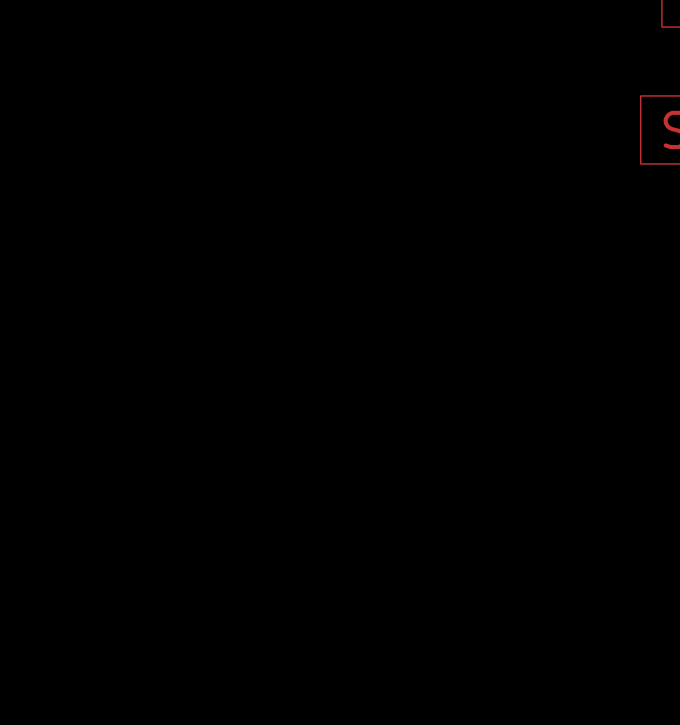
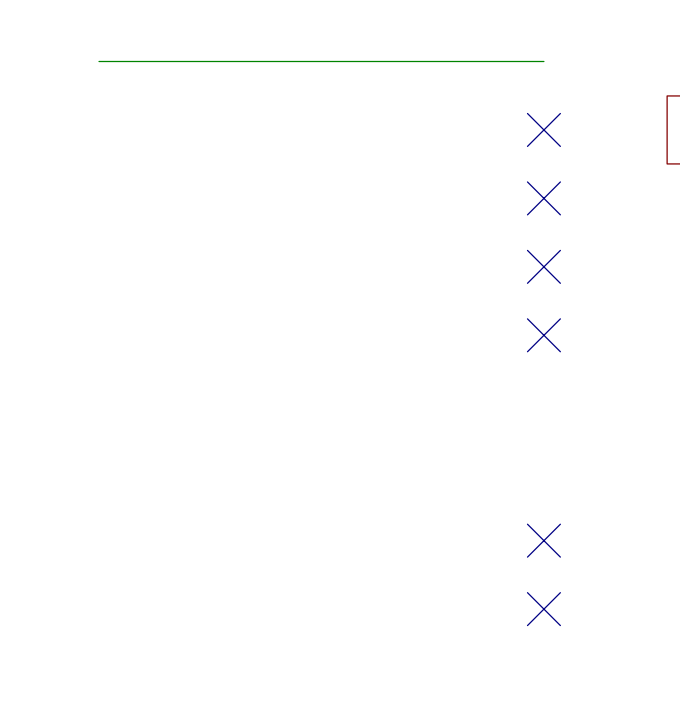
wire: none -> (99, 61) (543, 61)
no-connect mark: none -> (543, 129)
no-connect mark: none -> (543, 198)
no-connect mark: none -> (543, 266)
no-connect mark: none -> (543, 335)
no-connect mark: none -> (543, 540)
no-connect mark: none -> (543, 609)

